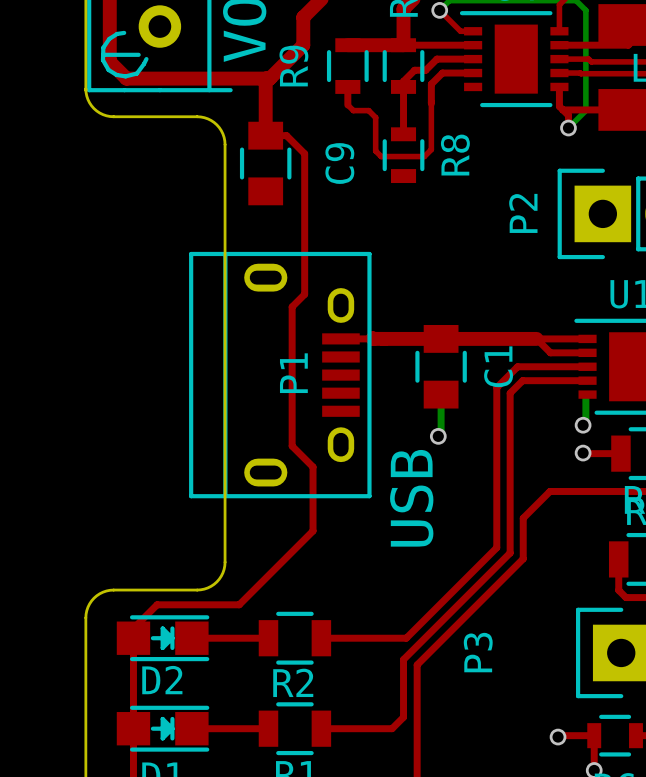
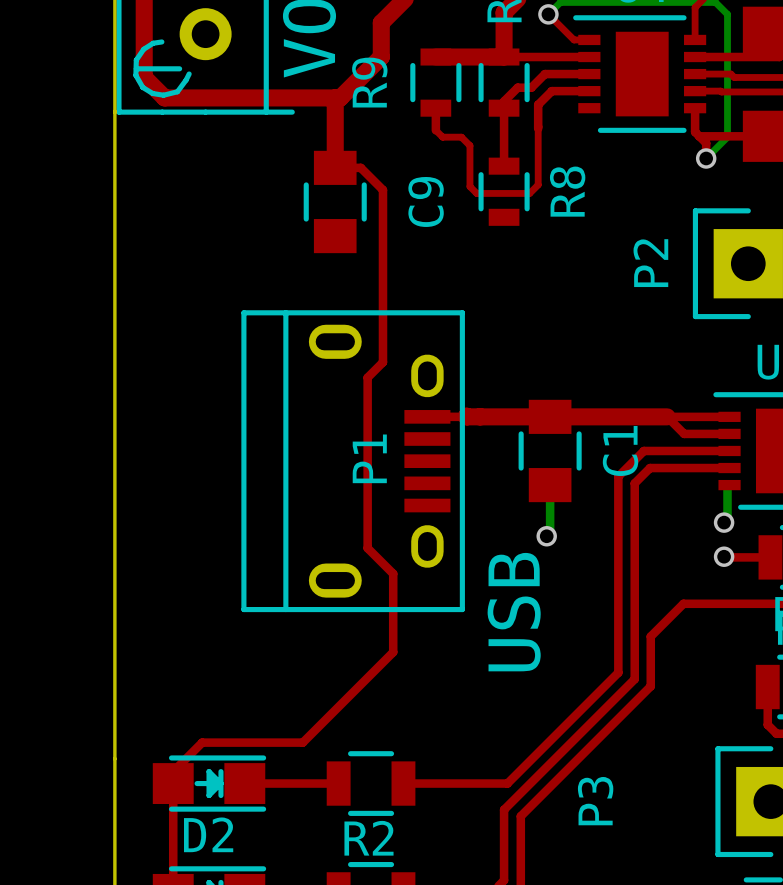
board edge: (85, 88) (91, 105) (103, 114) (113, 116) (204, 117) (219, 127) (225, 144) (224, 569) (214, 584) (200, 589) (113, 590) (103, 592) (91, 600) (85, 617) -> (114, 112) (114, 758)

